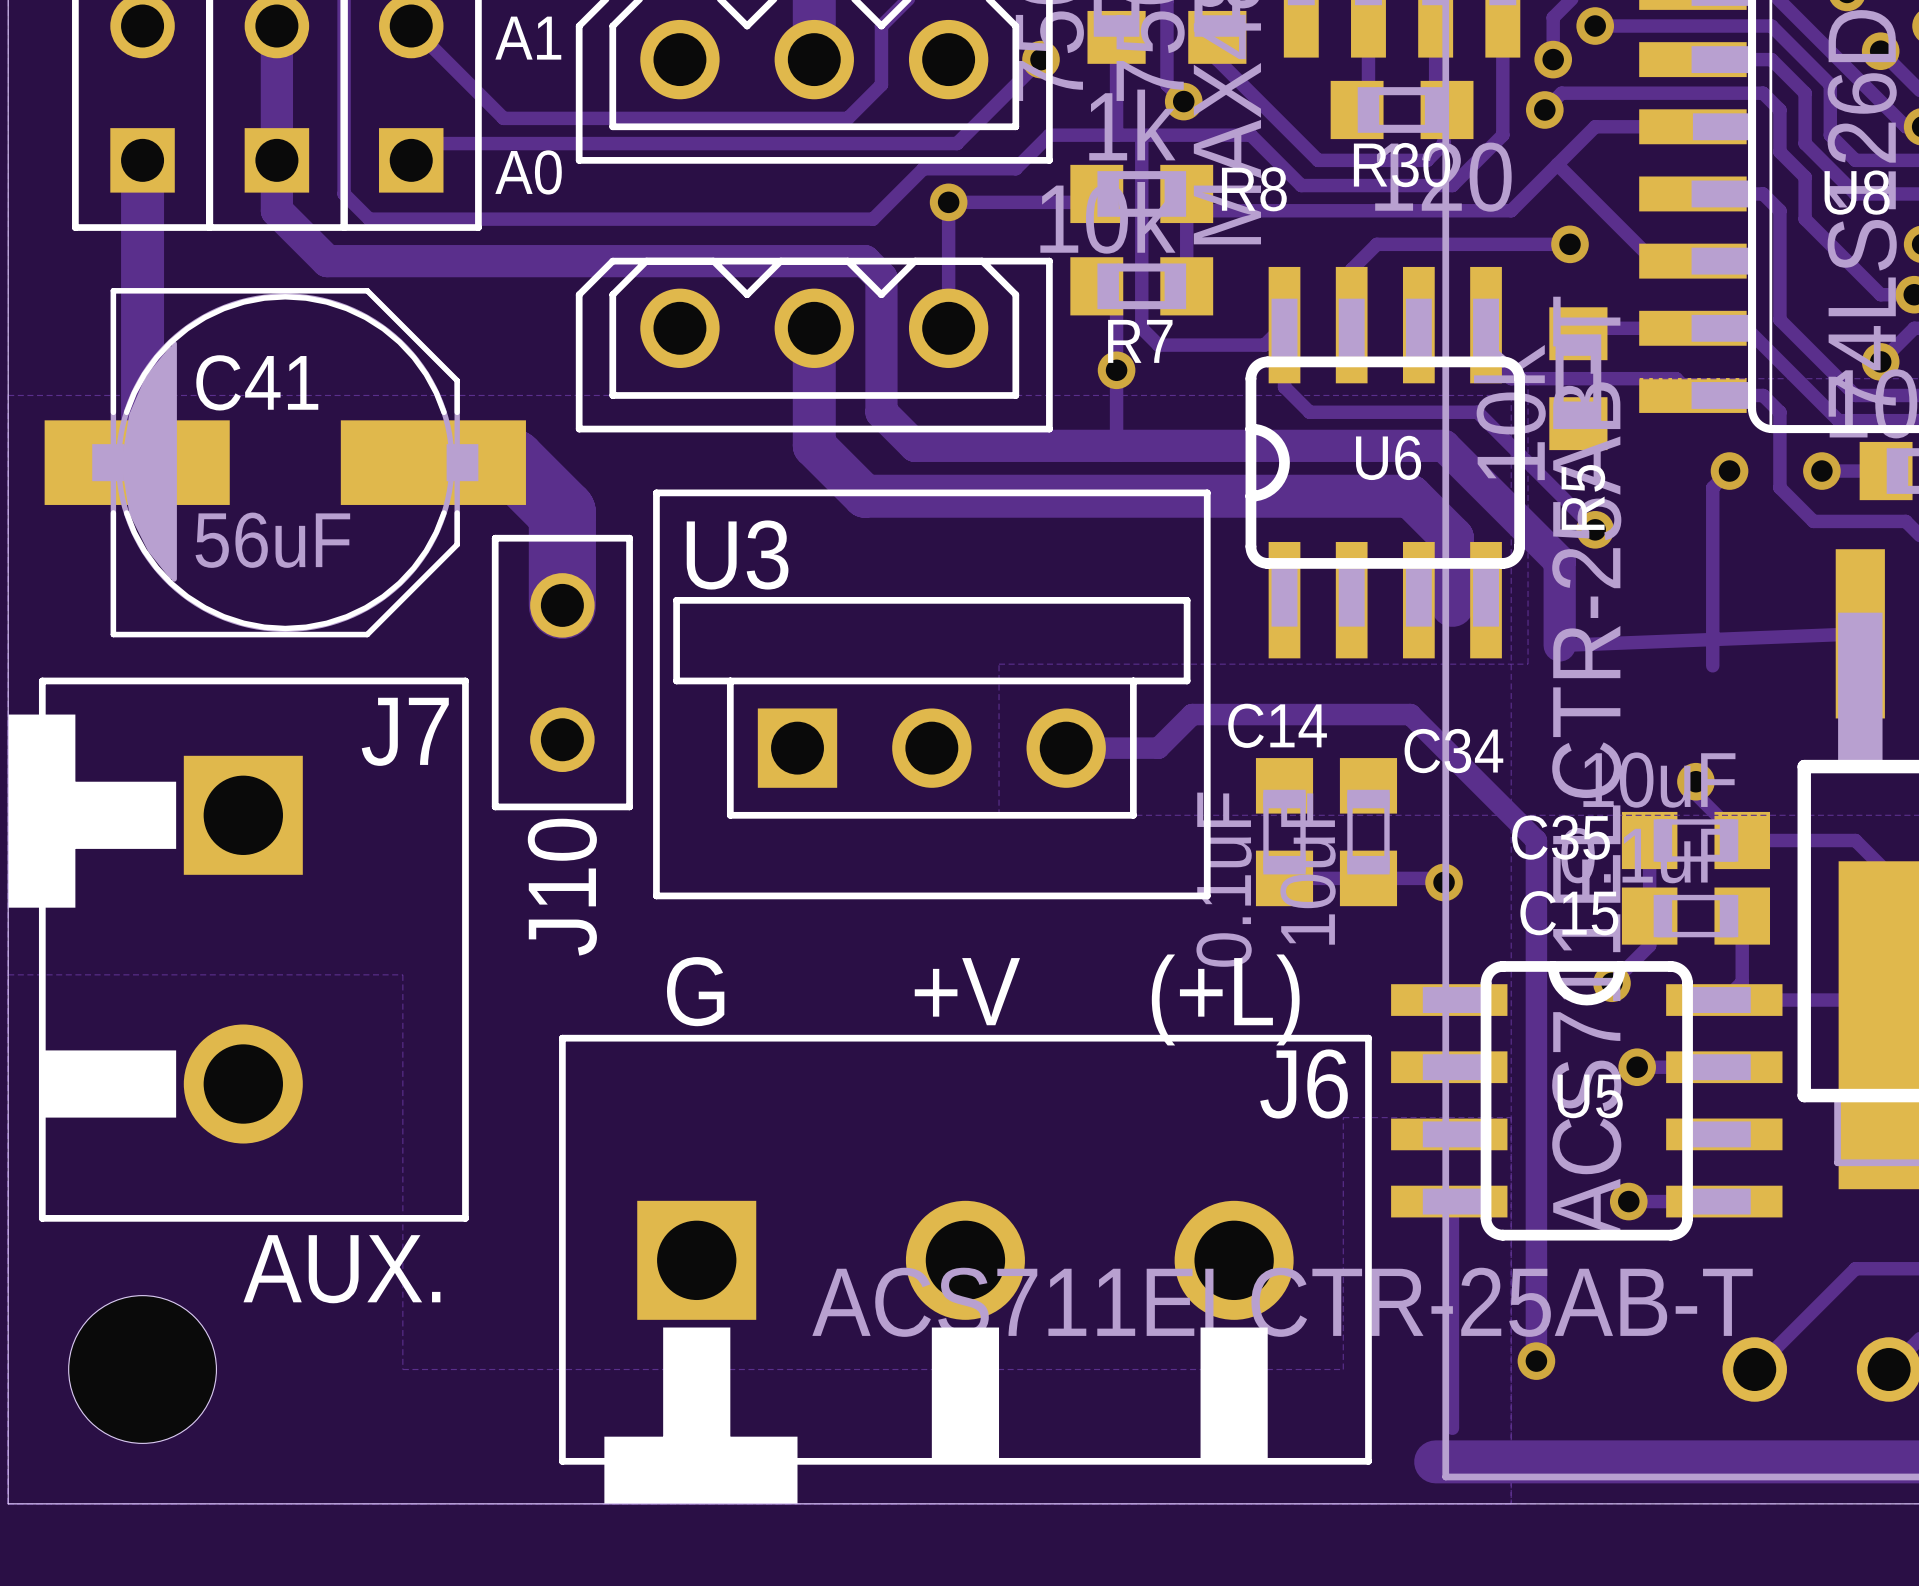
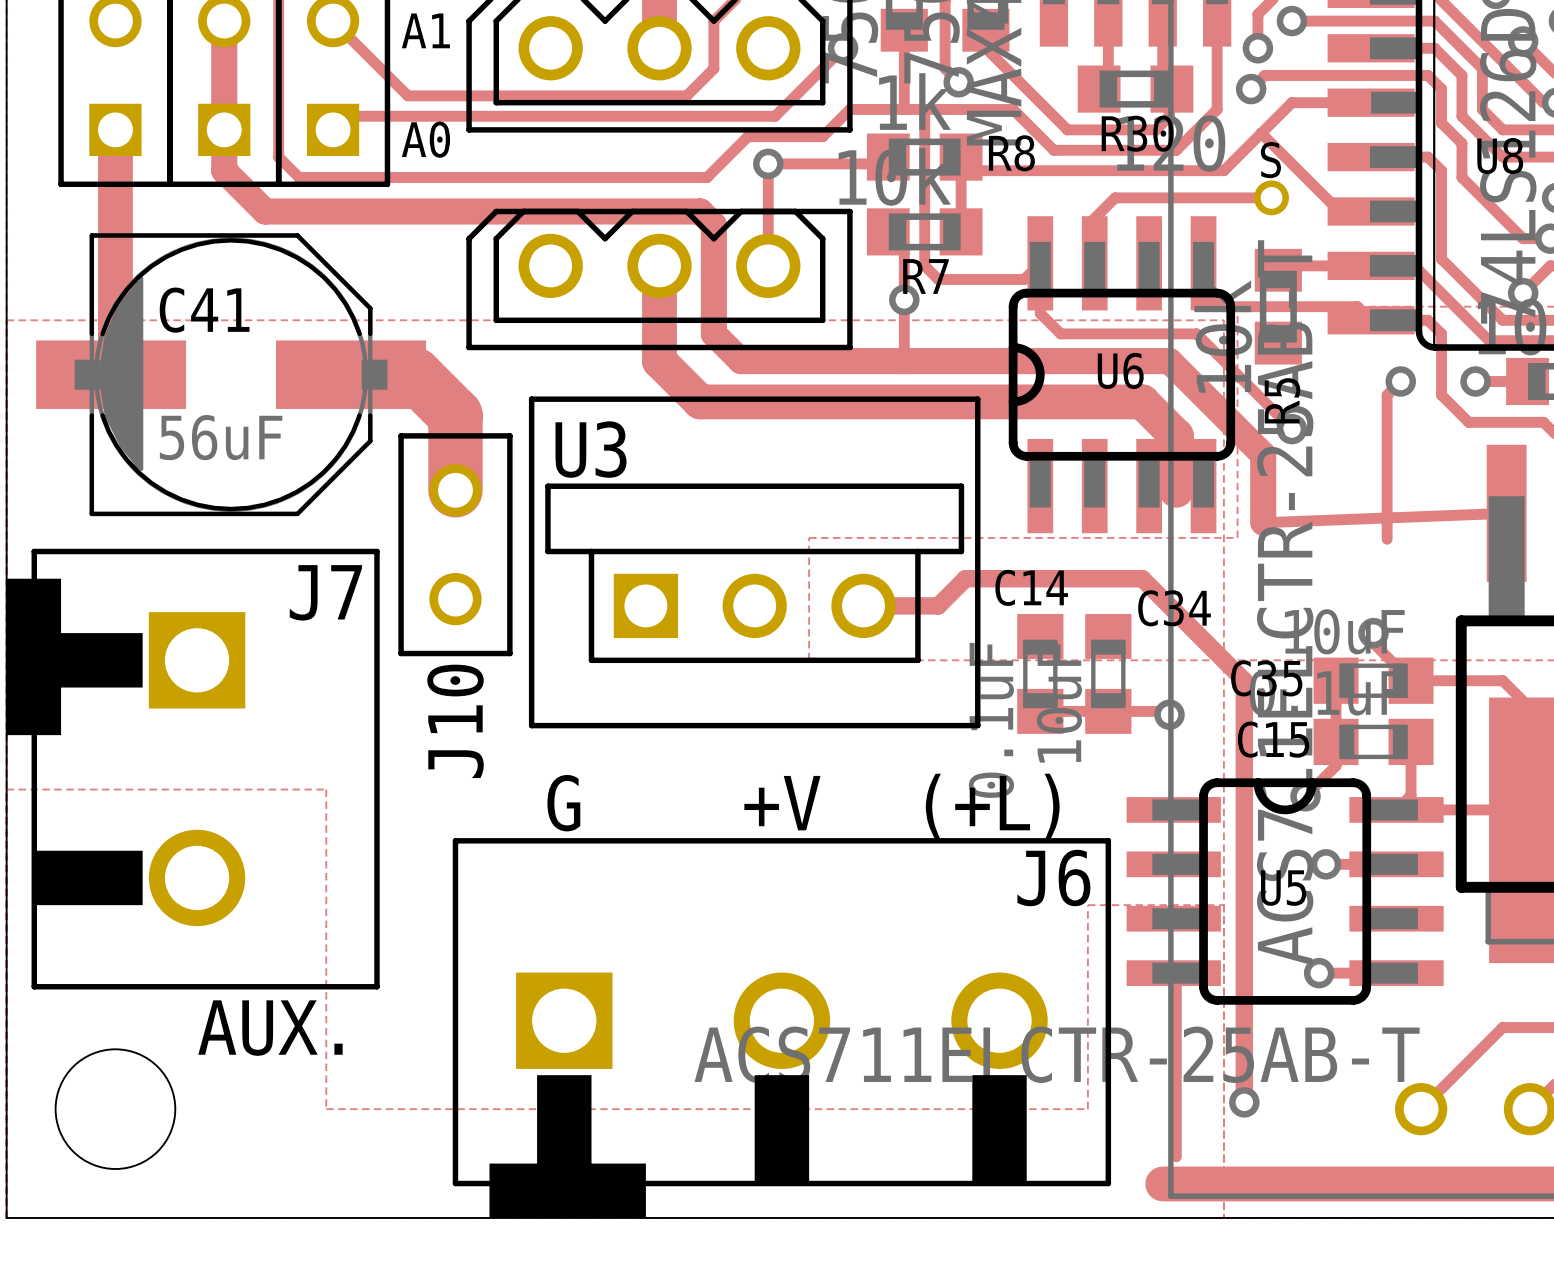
text: none -> S (1270, 160)
via: (1570, 244) -> none
part: none -> (1271, 197)

